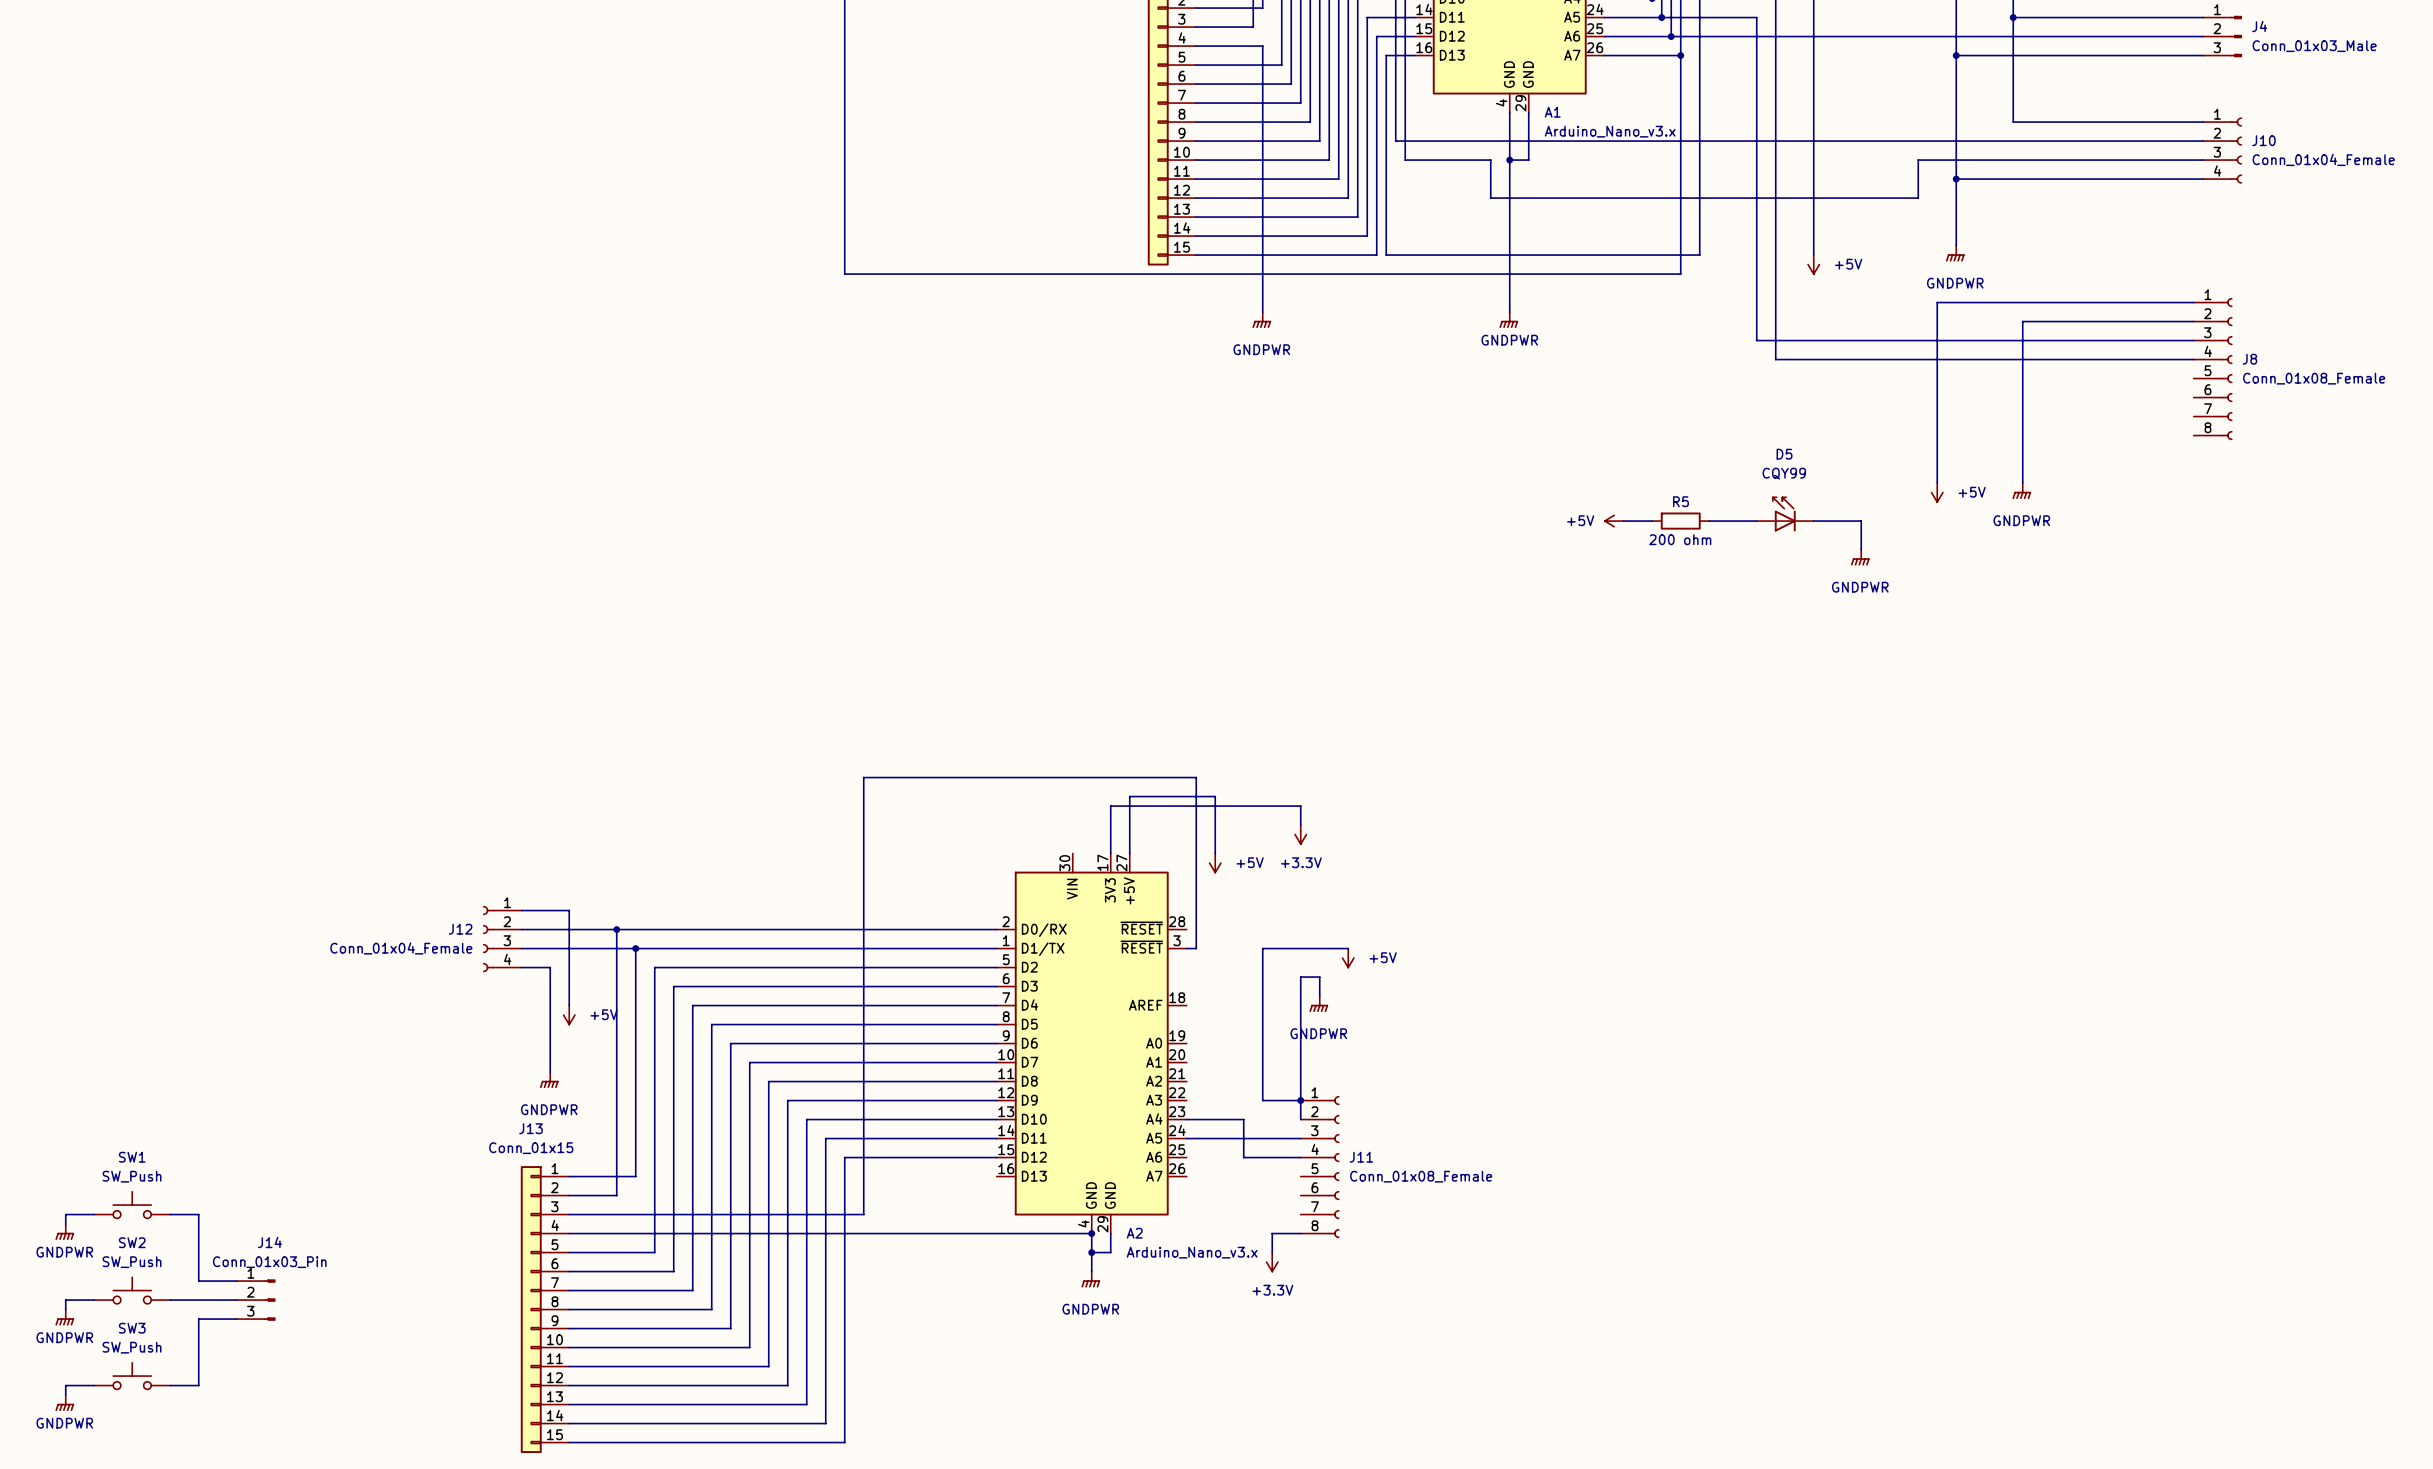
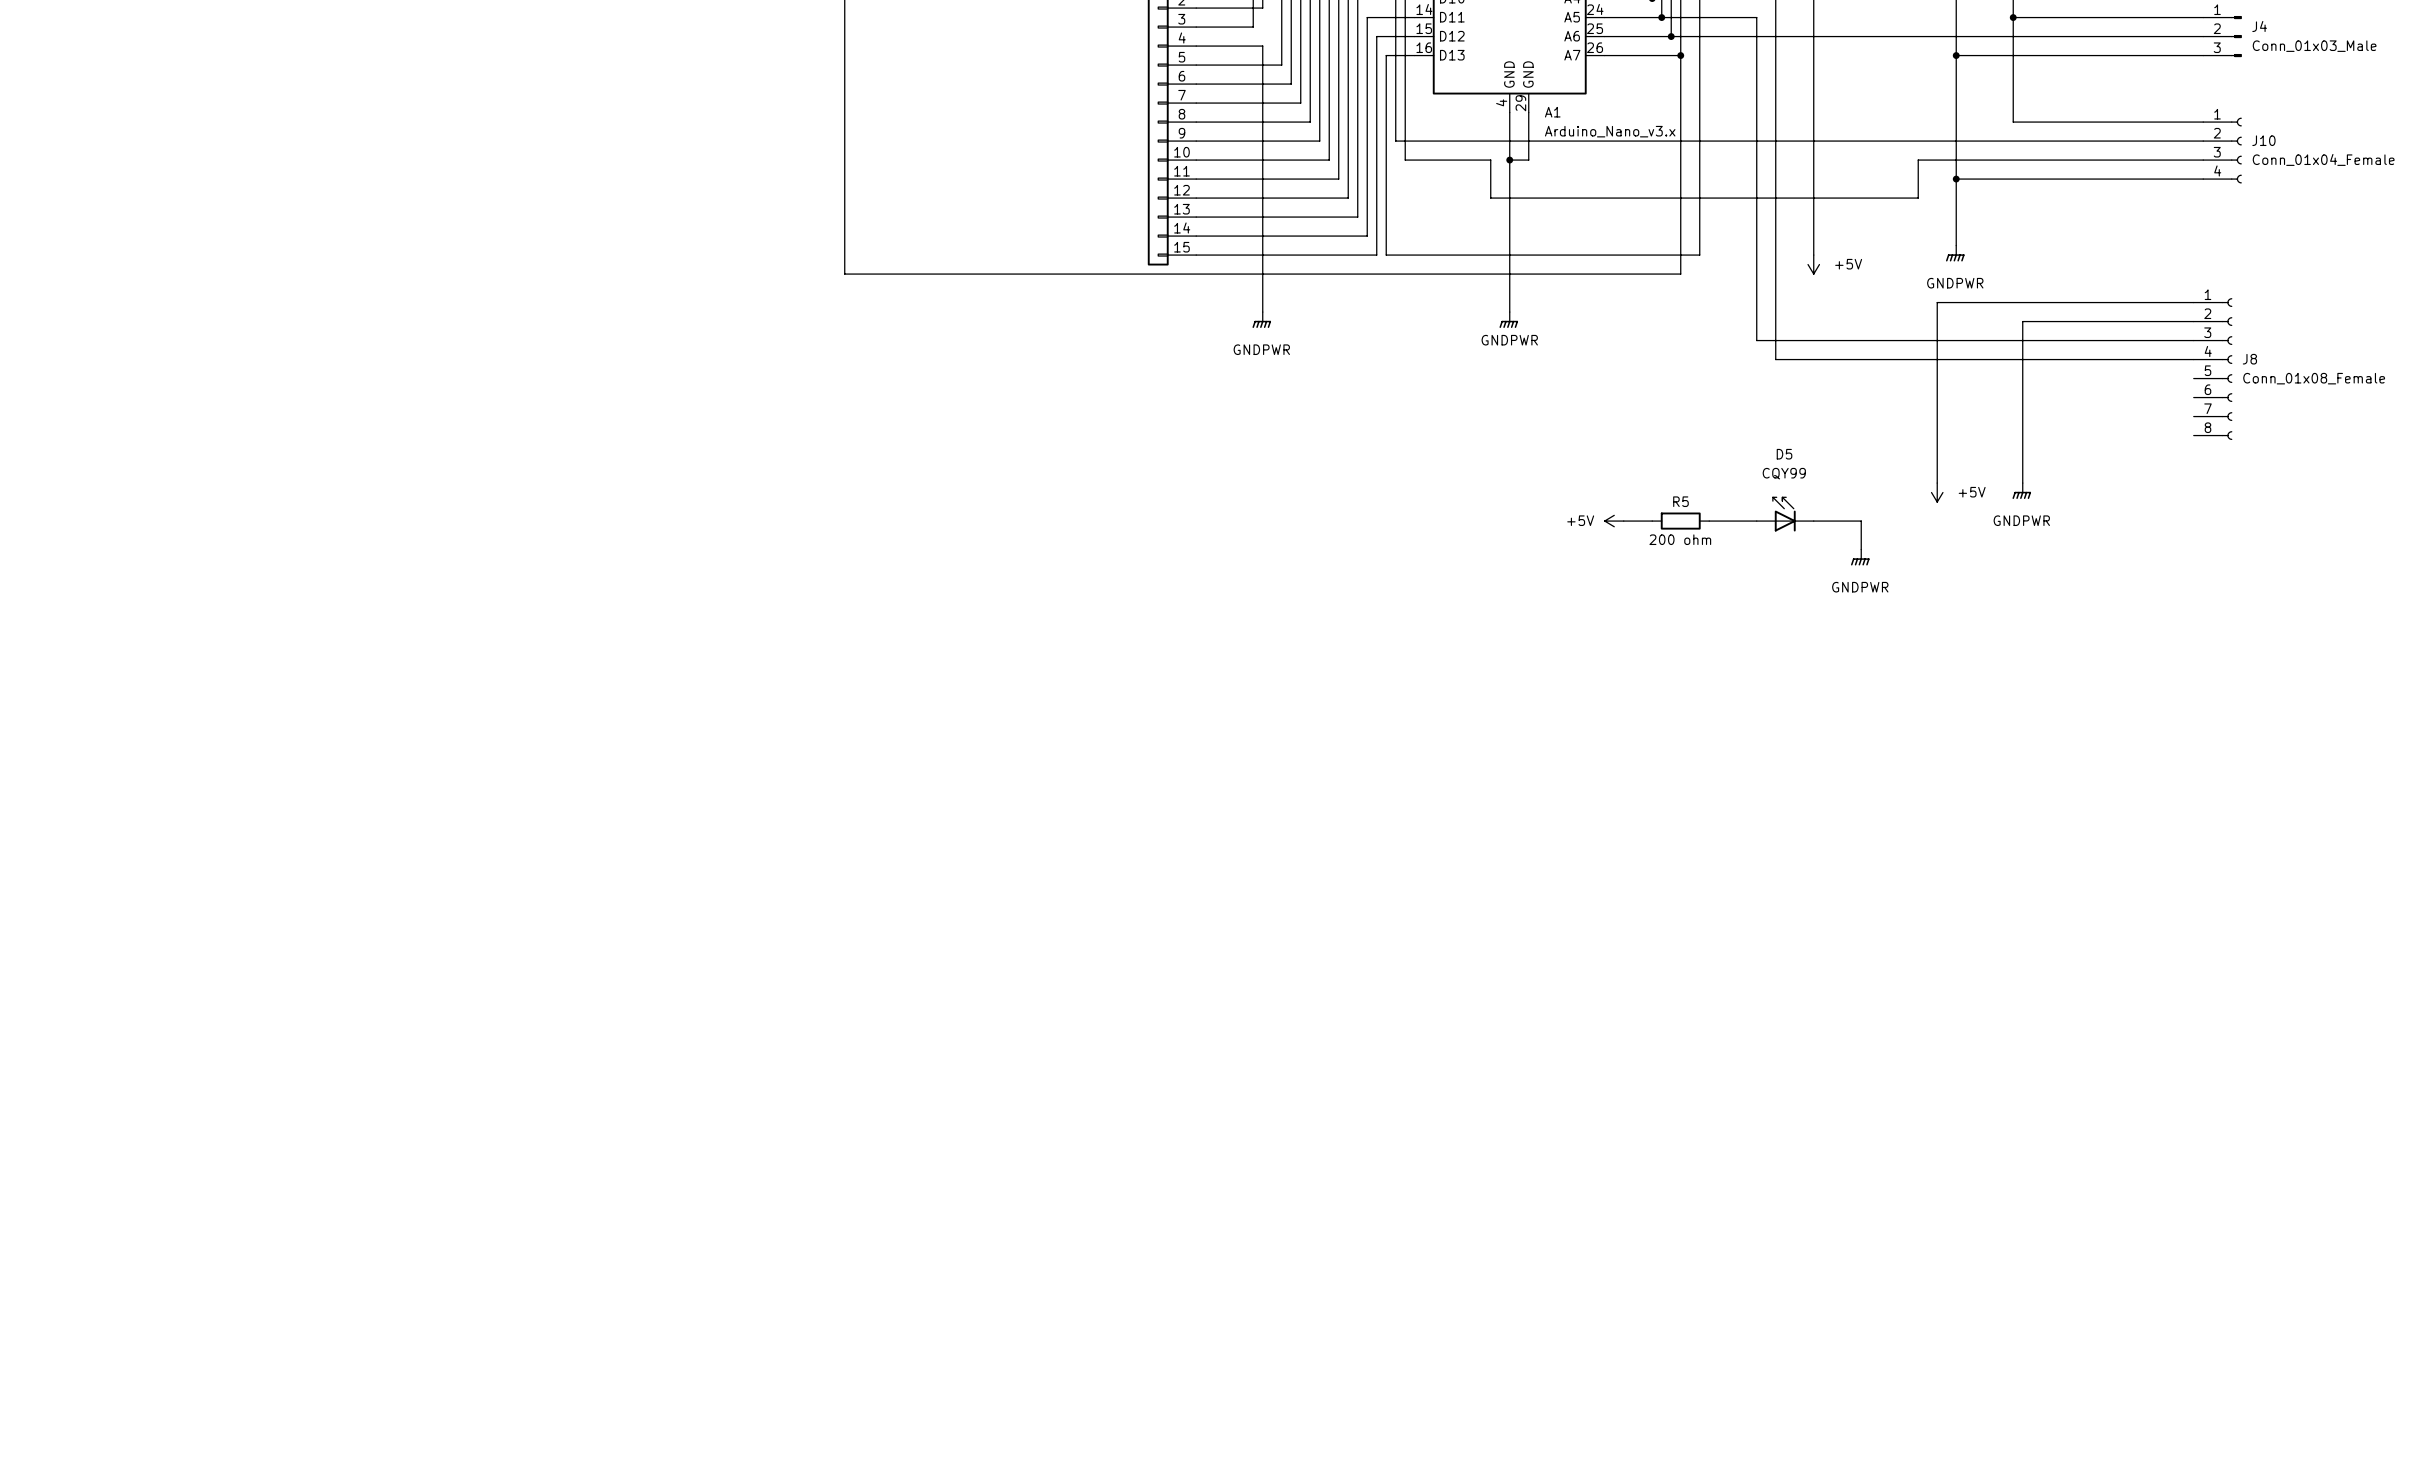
wire: (1300, 825) (1300, 806) (1110, 806) (1110, 853) -> none
power symbol: +3.3V (1300, 834) -> none
wire: (1129, 853) (1129, 796) (1215, 796) (1215, 853) -> none
power symbol: +5V (1215, 863) -> none
wire: (521, 910) (569, 910) (569, 1005) -> none
wire: (521, 929) (996, 929) -> none
wire: (616, 929) (616, 1195) (569, 1195) -> none
junction: (616, 929) -> none
J12: Conn_01x04_Female (502, 939) -> none
wire: (521, 948) (996, 948) -> none
wire: (635, 948) (635, 1176) (569, 1176) -> none
junction: (635, 948) -> none
wire: (1186, 948) (1196, 948) (1196, 777) (863, 777) (863, 1214) (569, 1214) -> none
wire: (1348, 948) (1262, 948) (1262, 1100) (1300, 1100) -> none
power symbol: +5V (1348, 958) -> none
wire: (521, 967) (550, 967) (550, 1072) -> none
wire: (996, 967) (654, 967) (654, 1252) (569, 1252) -> none
wire: (996, 986) (673, 986) (673, 1271) (569, 1271) -> none
wire: (1319, 996) (1319, 977) (1300, 977) (1300, 1119) -> none
power symbol: GNDPWR (1318, 1004) -> none
wire: (996, 1005) (692, 1005) (692, 1290) (569, 1290) -> none
power symbol: +5V (569, 1015) -> none
wire: (996, 1024) (711, 1024) (711, 1309) (569, 1309) -> none
wire: (996, 1043) (730, 1043) (730, 1328) (569, 1328) -> none
A2: Arduino_Nano_v3.x (1091, 1043) -> none
wire: (996, 1062) (749, 1062) (749, 1347) (569, 1347) -> none
power symbol: GNDPWR (549, 1080) -> none
wire: (996, 1081) (768, 1081) (768, 1366) (569, 1366) -> none
wire: (996, 1100) (787, 1100) (787, 1385) (569, 1385) -> none
junction: (1300, 1100) -> none
wire: (996, 1119) (806, 1119) (806, 1404) (569, 1404) -> none
wire: (1186, 1119) (1243, 1119) (1243, 1157) (1300, 1157) -> none
wire: (996, 1138) (825, 1138) (825, 1423) (569, 1423) -> none
wire: (1186, 1138) (1300, 1138) -> none
wire: (996, 1157) (844, 1157) (844, 1442) (569, 1442) -> none
J11: Conn_01x08_Female (1320, 1167) -> none
SW1: SW_Push (132, 1205) -> none
wire: (94, 1214) (65, 1214) (65, 1224) -> none
wire: (170, 1214) (198, 1214) (198, 1281) (236, 1281) -> none
power symbol: GNDPWR (64, 1232) -> none
wire: (569, 1233) (1091, 1233) (1091, 1271) -> none
junction: (1091, 1233) -> none
wire: (1110, 1233) (1110, 1252) (1091, 1252) -> none
wire: (1300, 1233) (1272, 1233) (1272, 1252) -> none
junction: (1091, 1252) -> none
power symbol: +3.3V (1272, 1262) -> none
power symbol: GNDPWR (1090, 1279) -> none
SW2: SW_Push (132, 1290) -> none
wire: (94, 1300) (65, 1300) (65, 1309) -> none
wire: (170, 1300) (236, 1300) -> none
J14: Conn_01x03_Pin (256, 1300) -> none
J13: Conn_01x15 (545, 1309) -> none
power symbol: GNDPWR (64, 1317) -> none
wire: (236, 1319) (198, 1319) (198, 1385) (170, 1385) -> none
SW3: SW_Push (132, 1376) -> none
wire: (94, 1385) (65, 1385) (65, 1395) -> none
power symbol: GNDPWR (64, 1403) -> none

